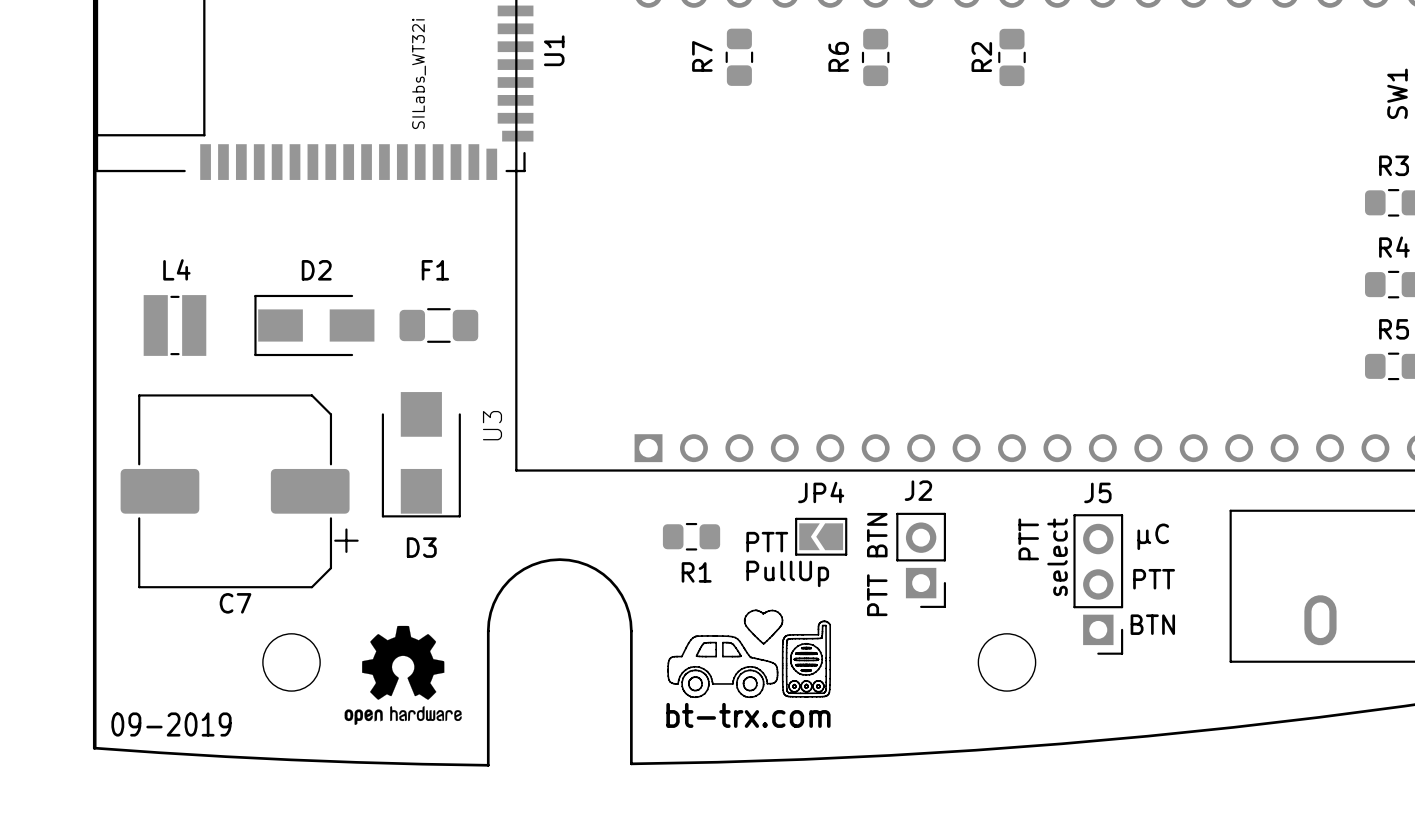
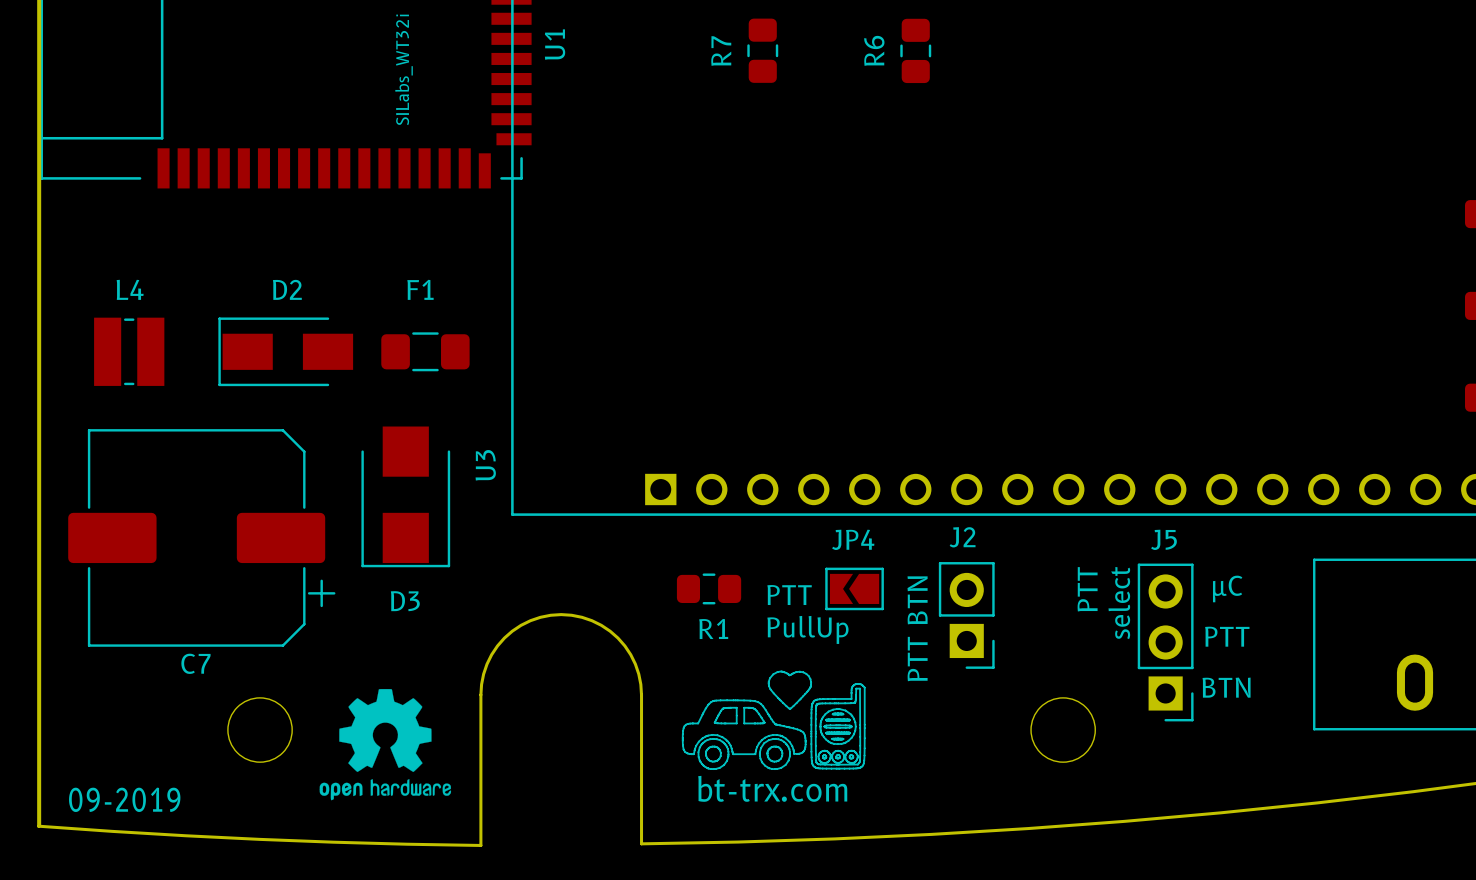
R2: (1011, 57) -> none

